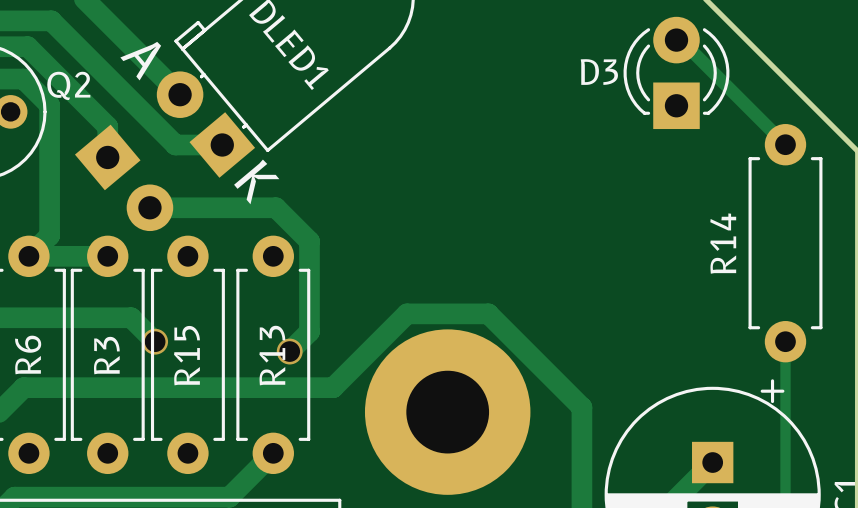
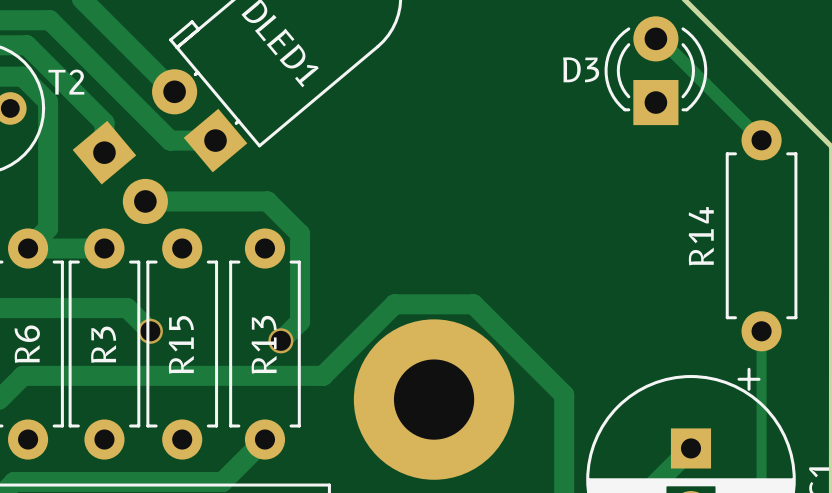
text: A (140, 61) -> none
Q2 name: Q2 (68, 85) -> T2 (66, 82)
text: K (256, 181) -> none

